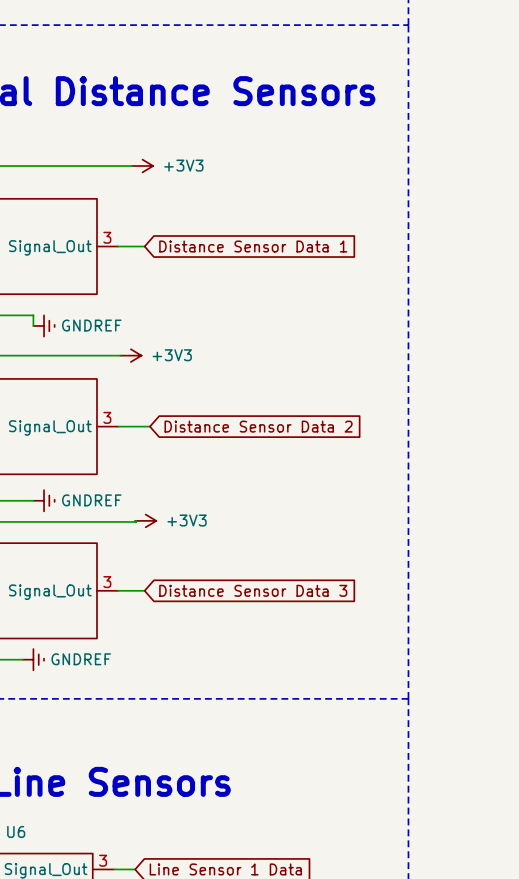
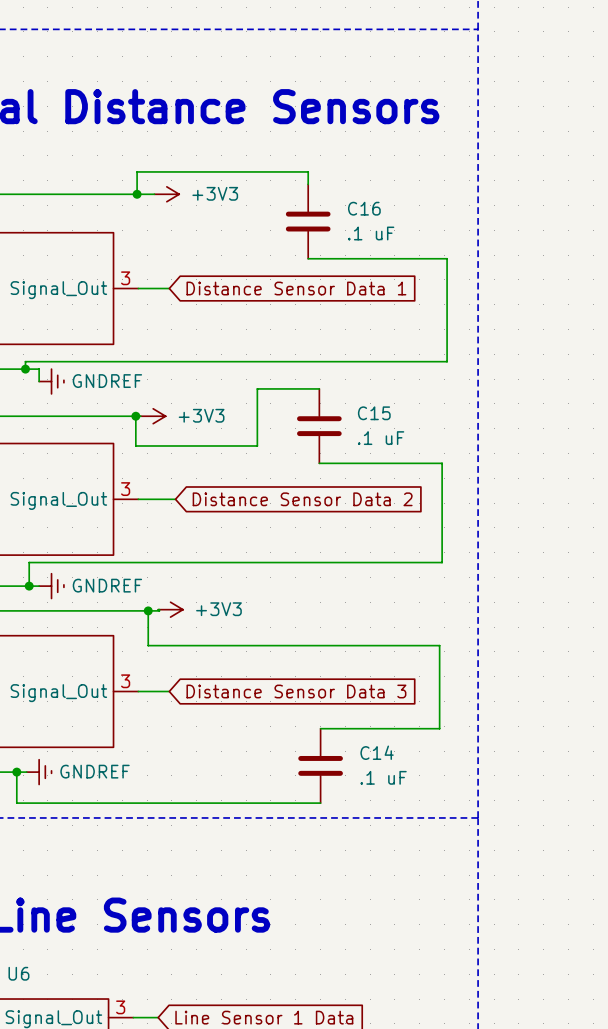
wire: none -> (308, 184) (308, 171) (137, 171) (137, 194)
junction: none -> (137, 194)
C16: none -> .1 uF (308, 221)
wire: none -> (308, 258) (447, 258) (447, 361) (25, 361) (25, 369)
junction: none -> (25, 369)
wire: none -> (319, 388) (257, 388) (257, 445) (135, 445) (135, 416)
junction: none -> (135, 416)
C15: none -> .1 uF (319, 426)
wire: none -> (319, 463) (442, 463) (442, 562) (29, 562) (29, 586)
junction: none -> (29, 586)
wire: none -> (148, 610) (148, 645) (439, 645) (439, 728) (320, 728)
junction: none -> (148, 610)
C14: none -> .1 uF (320, 765)
wire: none -> (16, 772) (16, 803) (320, 803)
junction: none -> (16, 772)

